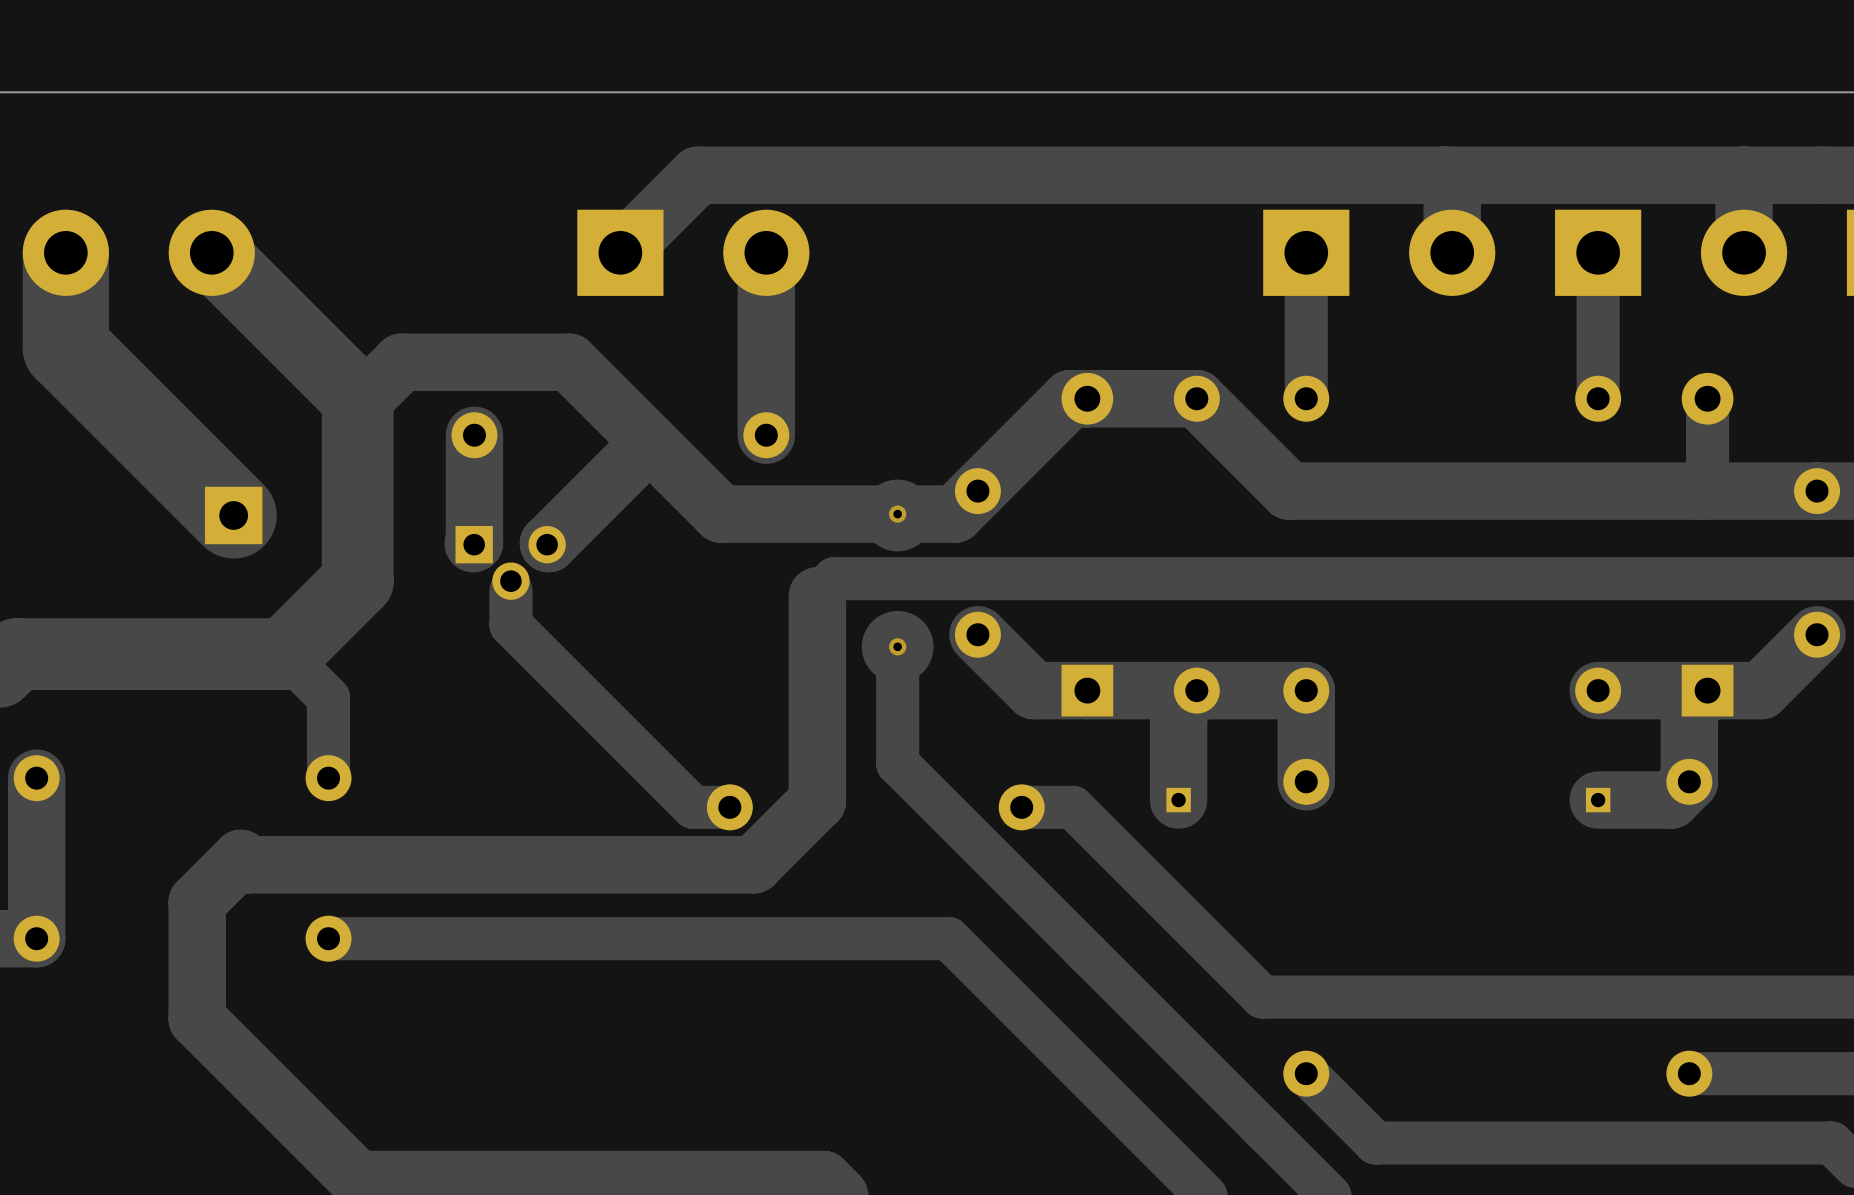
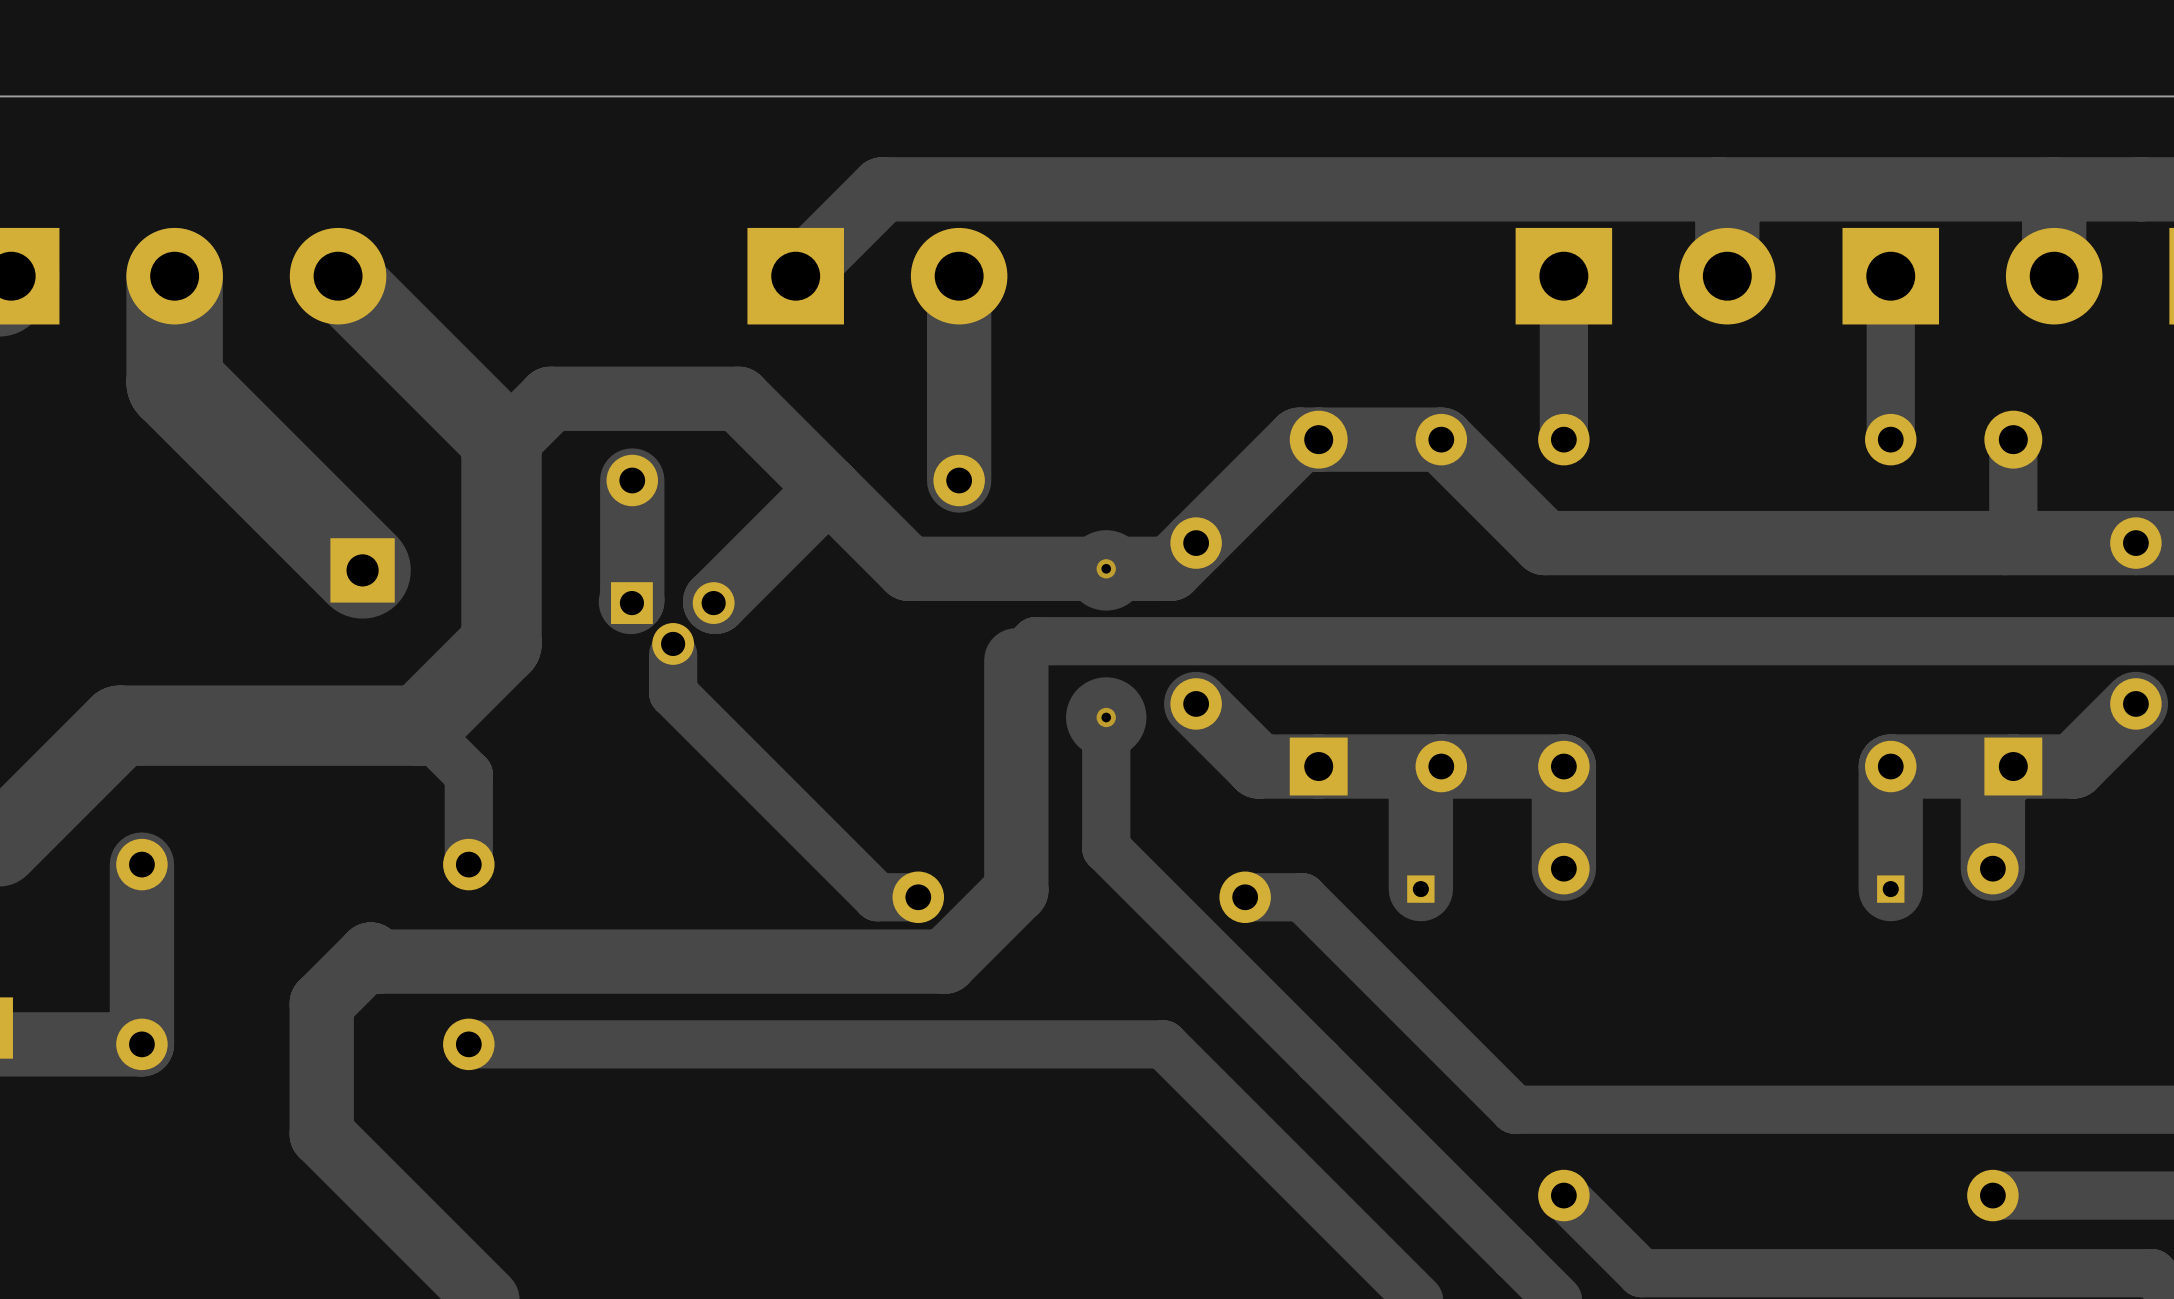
track: (1689, 781) (1671, 800) (1598, 800) -> (1890, 766) (1890, 889)

